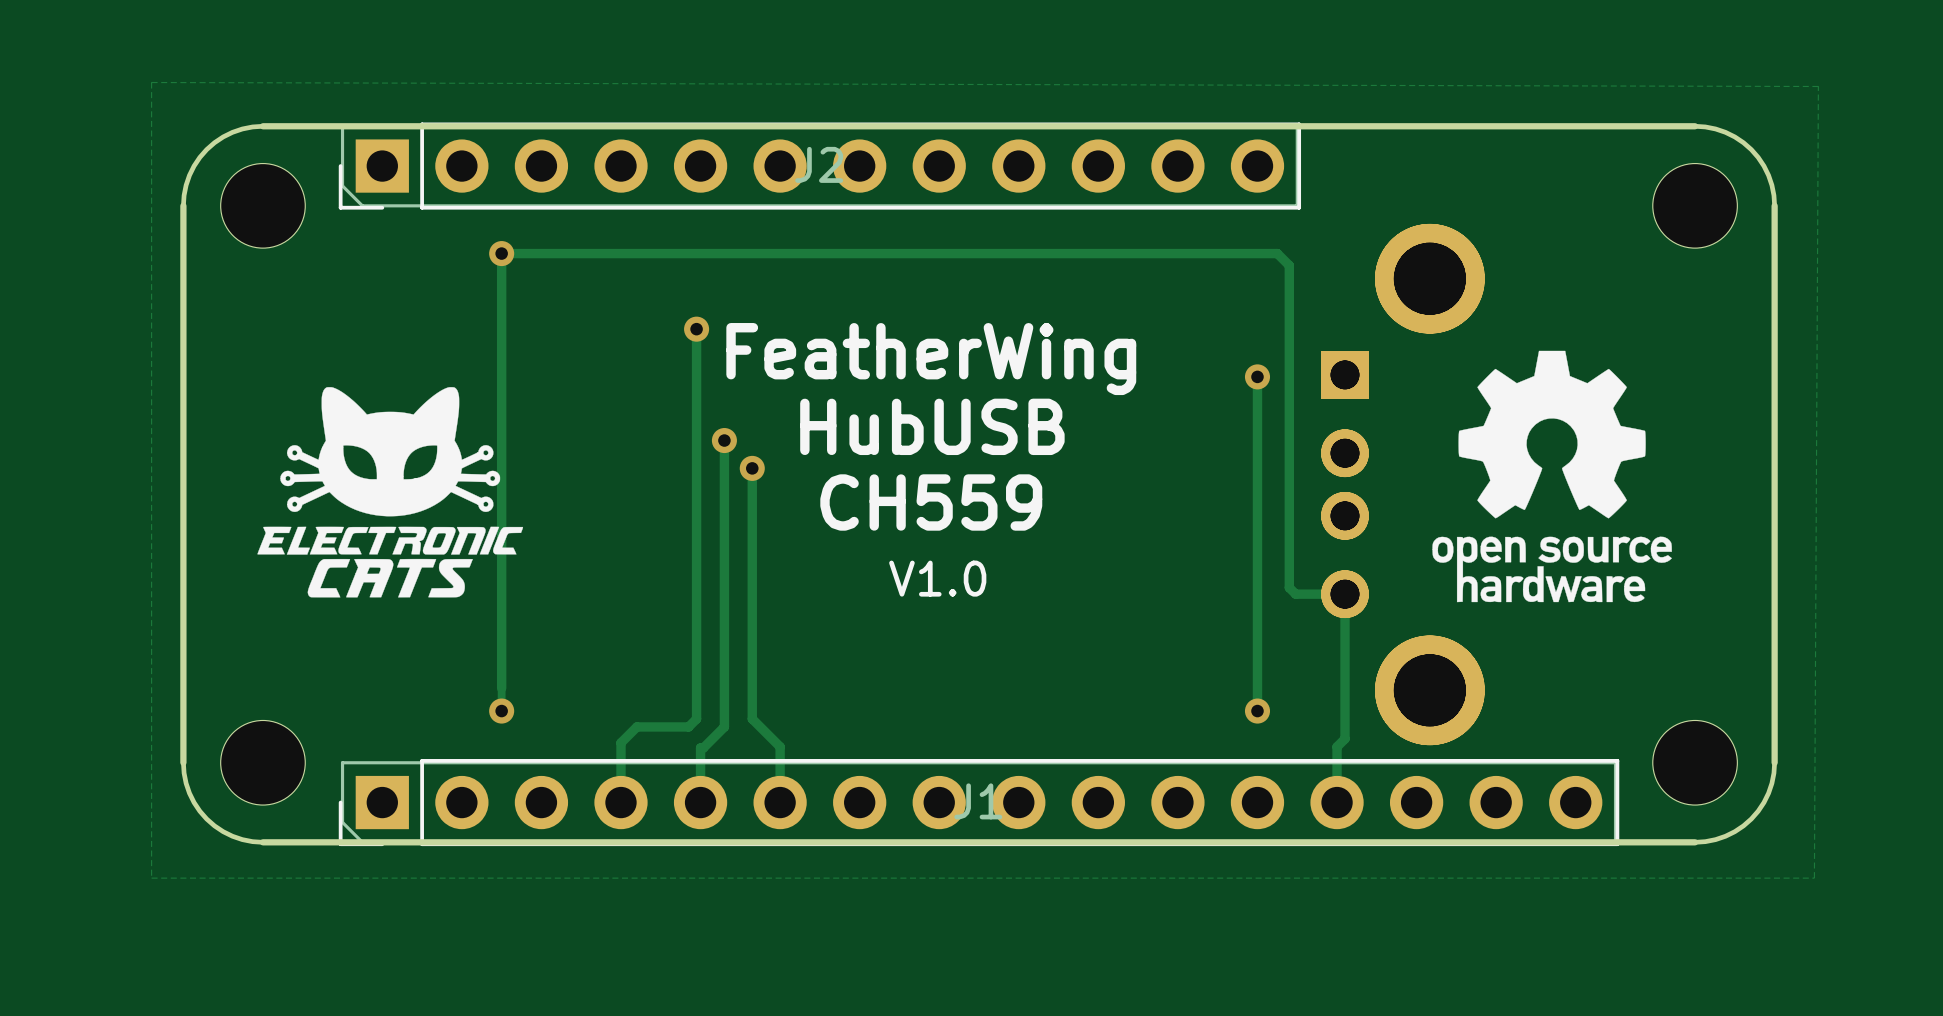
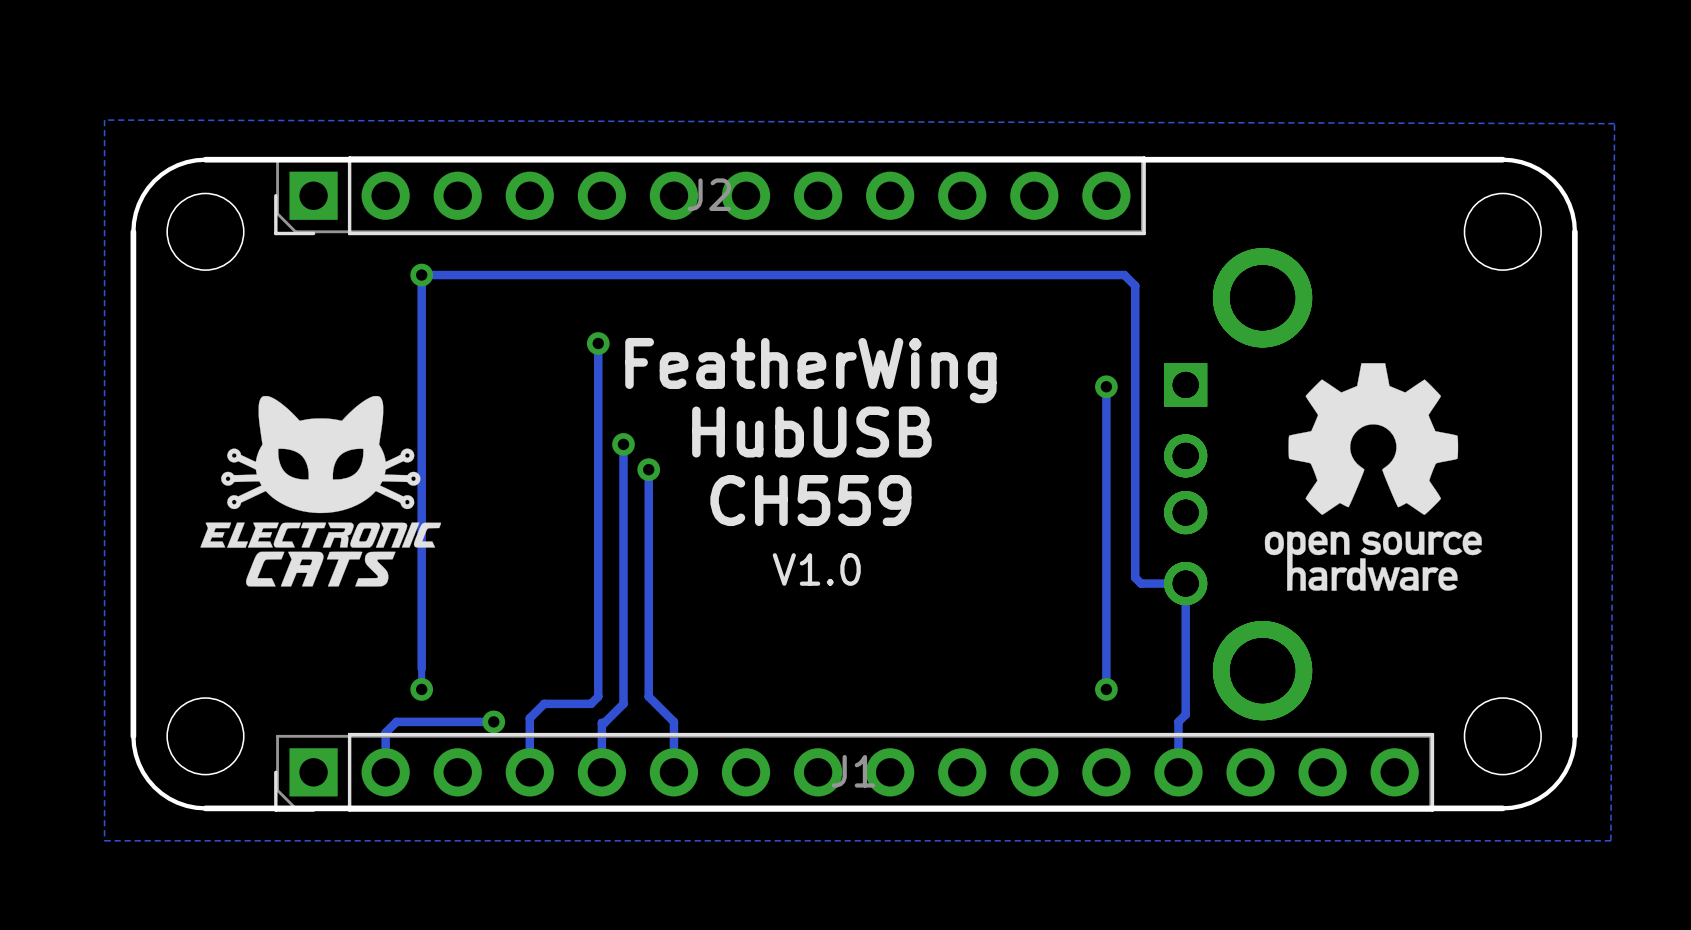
track: none -> (493, 721) (396, 721) (385, 732) (385, 772)
via: none -> (493, 721)

